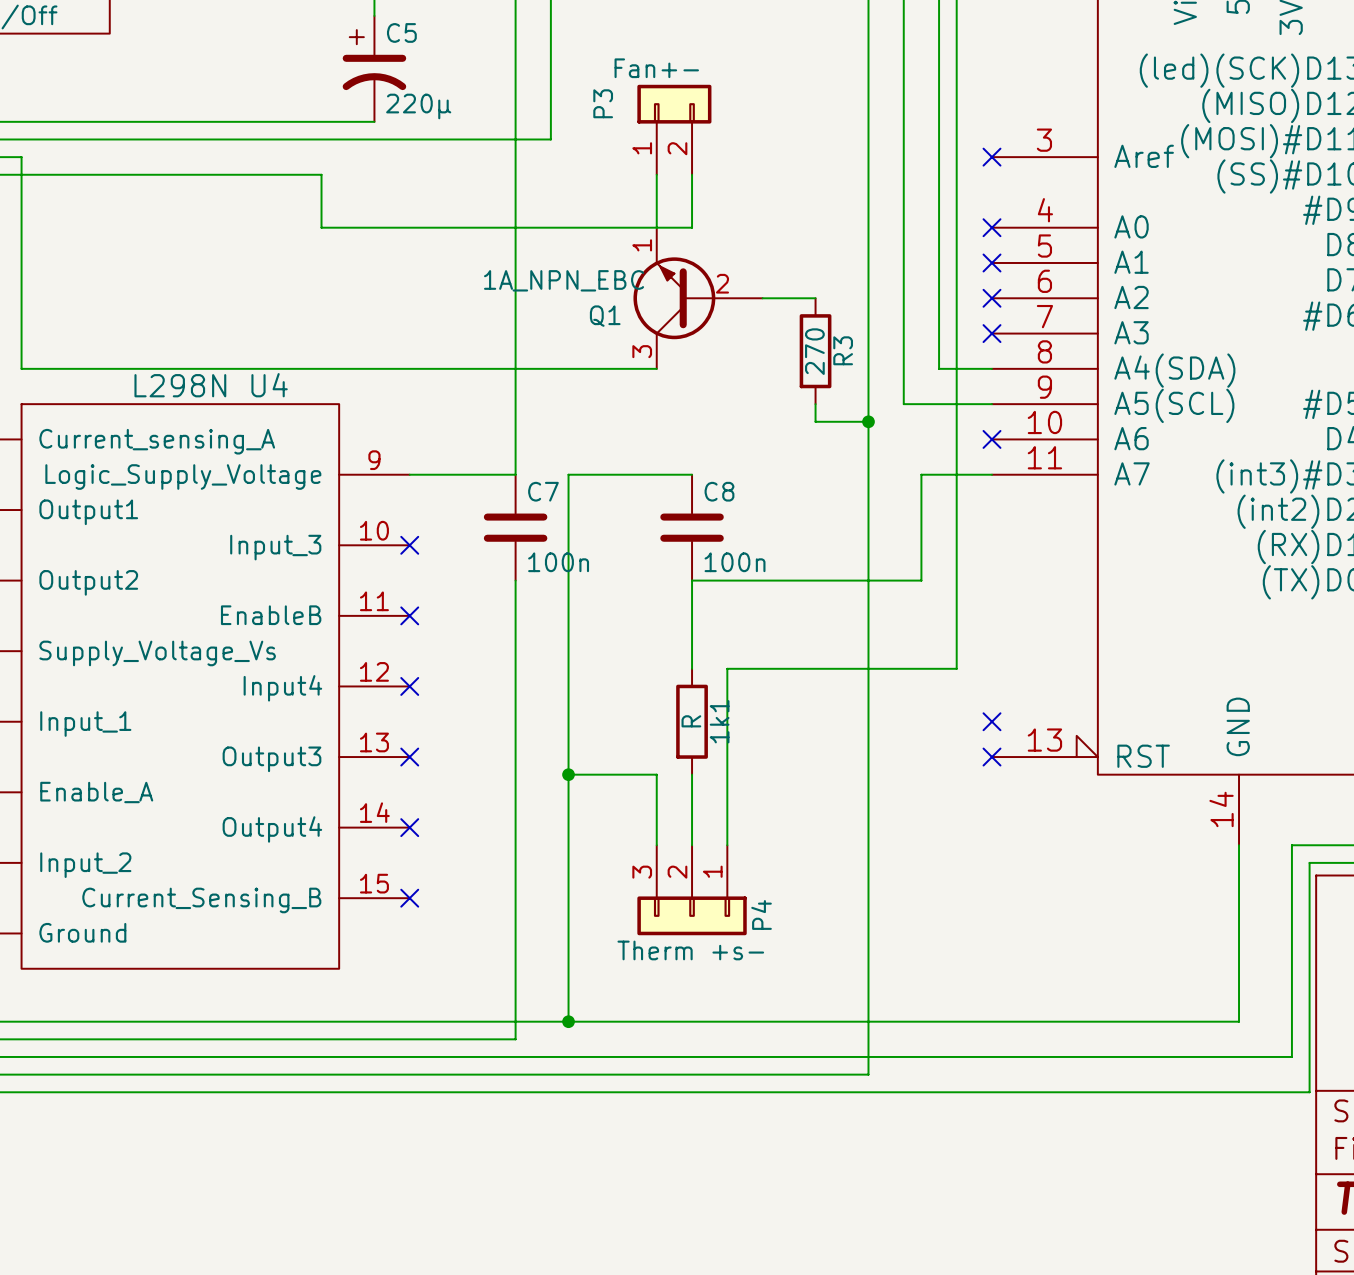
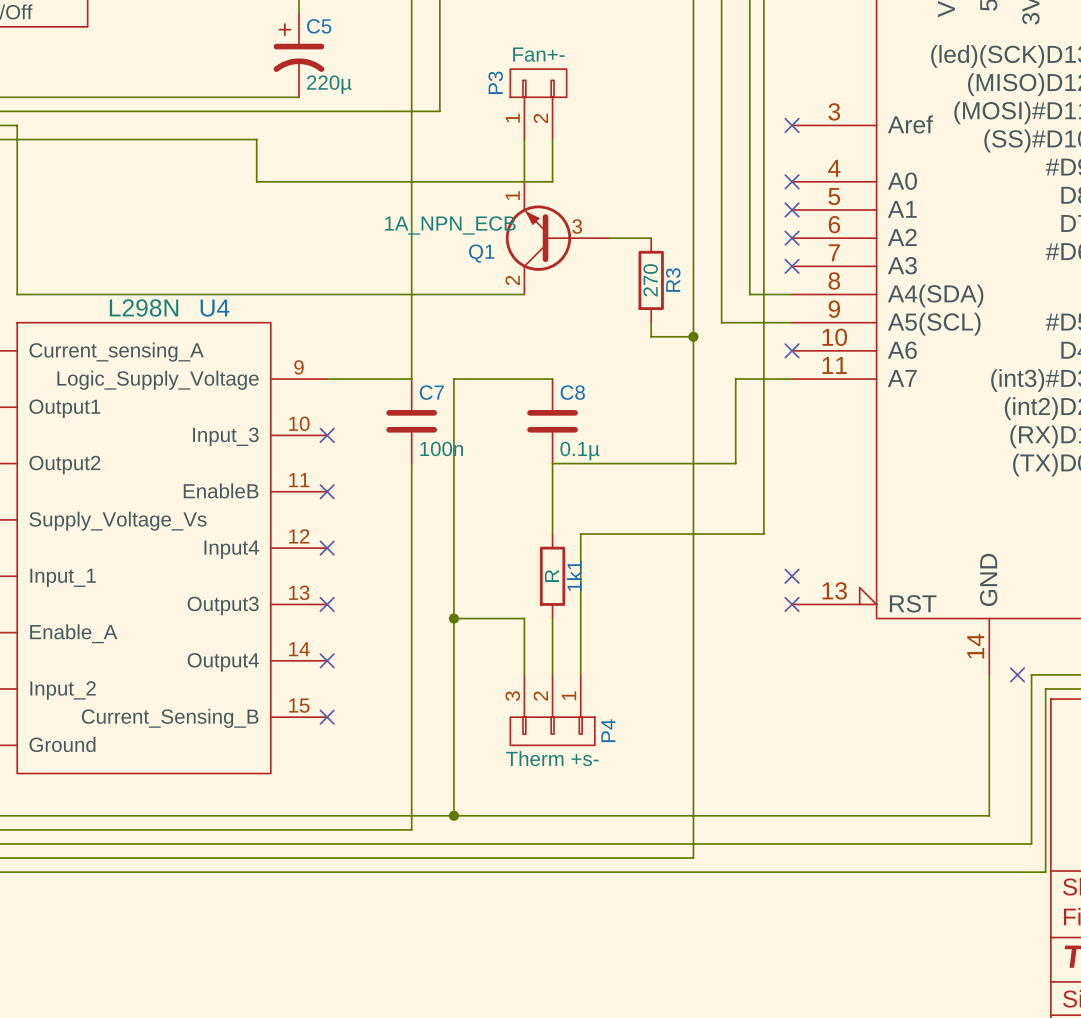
P3 symbol: [637, 84, 712, 175] -> [510, 69, 567, 140]
Q1 value: 1A_NPN_EBC (564, 280) -> 1A_NPN_ECB (450, 225)
Q1 pin number: 2 (722, 283) -> 3 (577, 226)
Q1 pin number: 3 (642, 351) -> 2 (512, 280)
C8 value: 100n (735, 562) -> 0.1µ (579, 450)
P4 symbol: [637, 845, 747, 936] -> [510, 674, 595, 746]
no-connect mark: none -> (1017, 674)

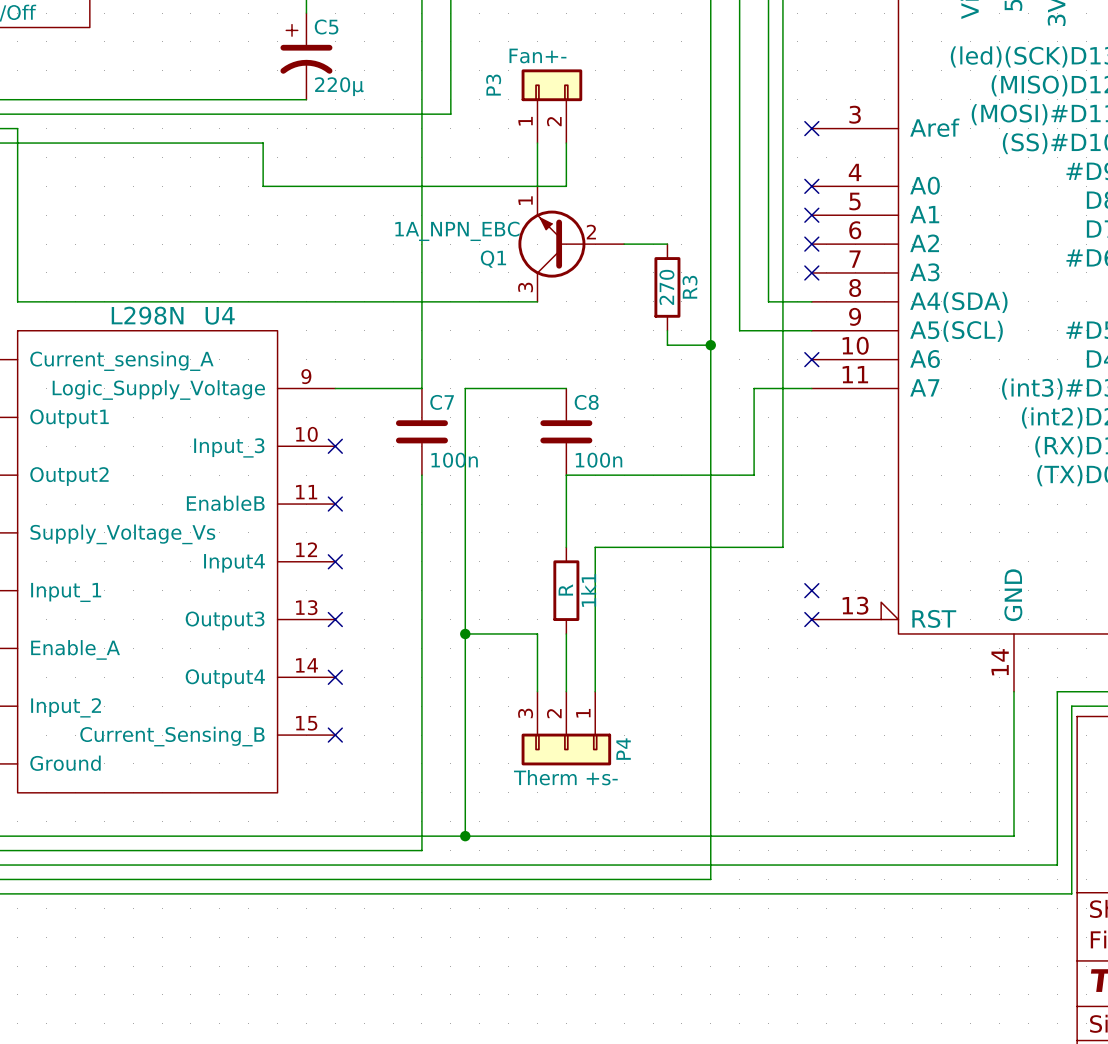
P3 symbol: [510, 69, 567, 140] -> [521, 69, 583, 144]
Q1 value: 1A_NPN_ECB (450, 225) -> 1A_NPN_EBC (457, 231)
Q1 pin number: 3 (577, 226) -> 2 (591, 232)
Q1 pin number: 2 (512, 280) -> 3 (525, 287)
C8 value: 0.1µ (579, 450) -> 100n (599, 460)
P4 symbol: [510, 674, 595, 746] -> [521, 691, 612, 766]
no-connect mark: (1017, 674) -> none

